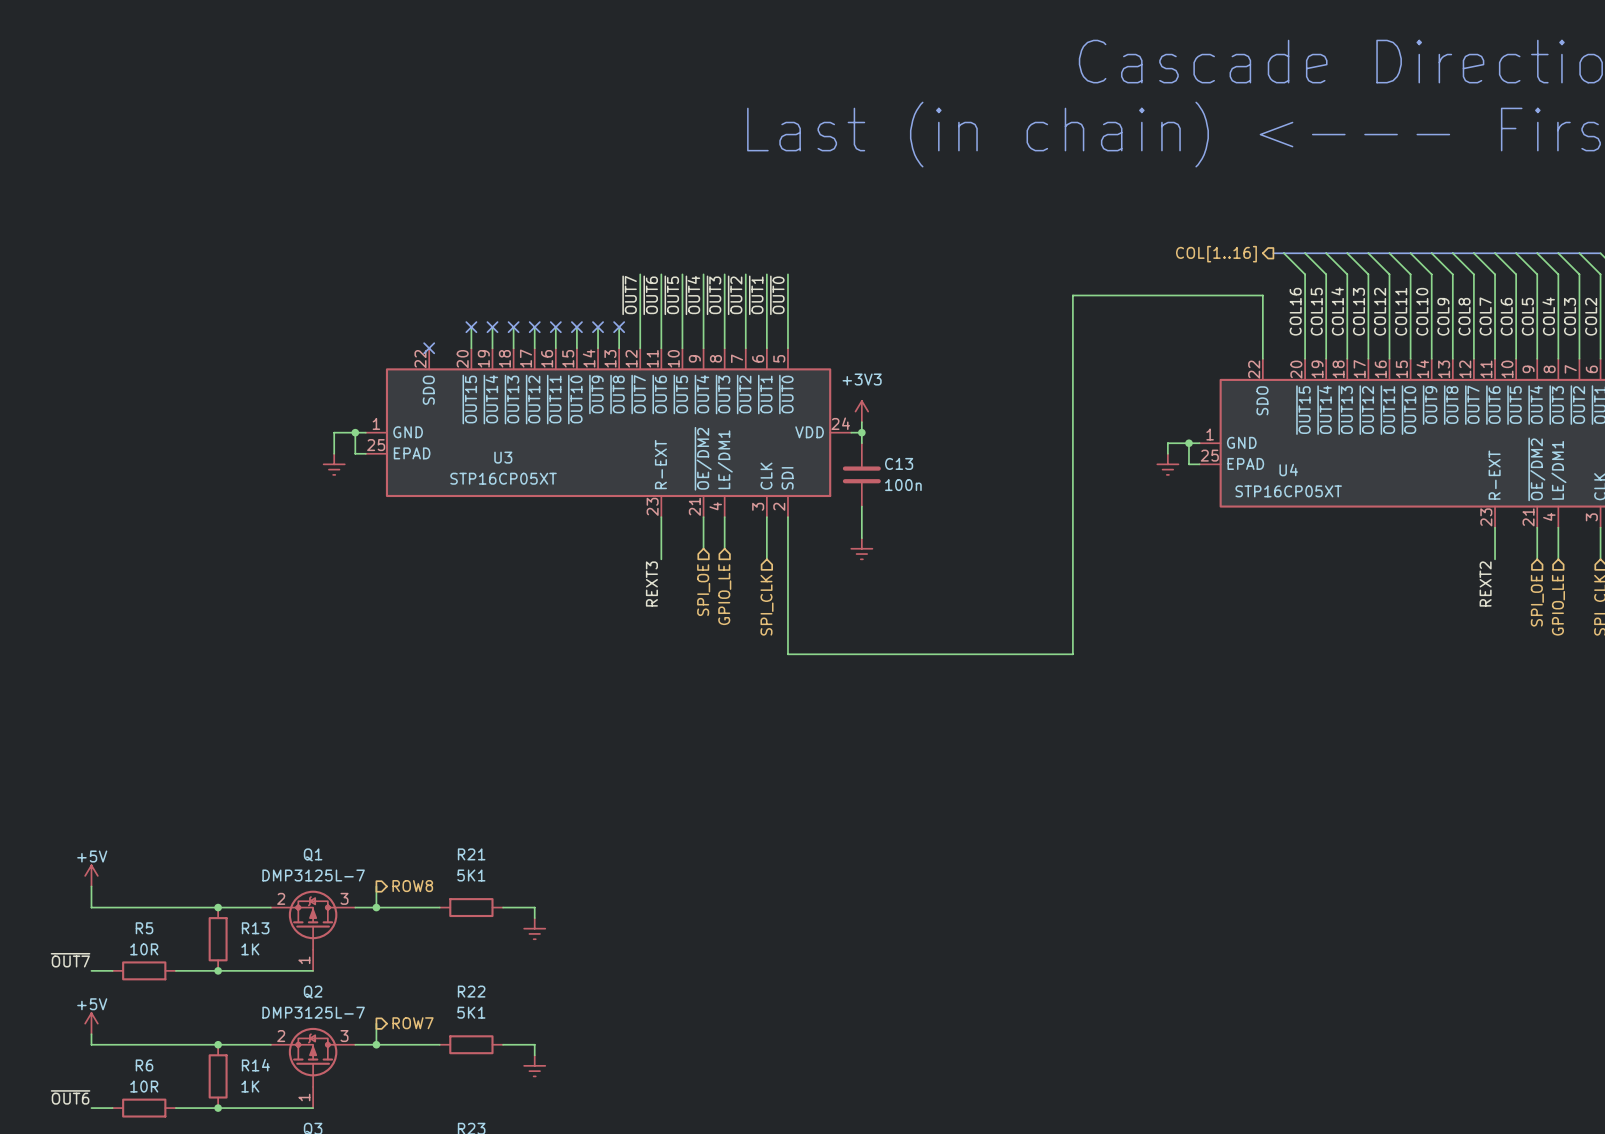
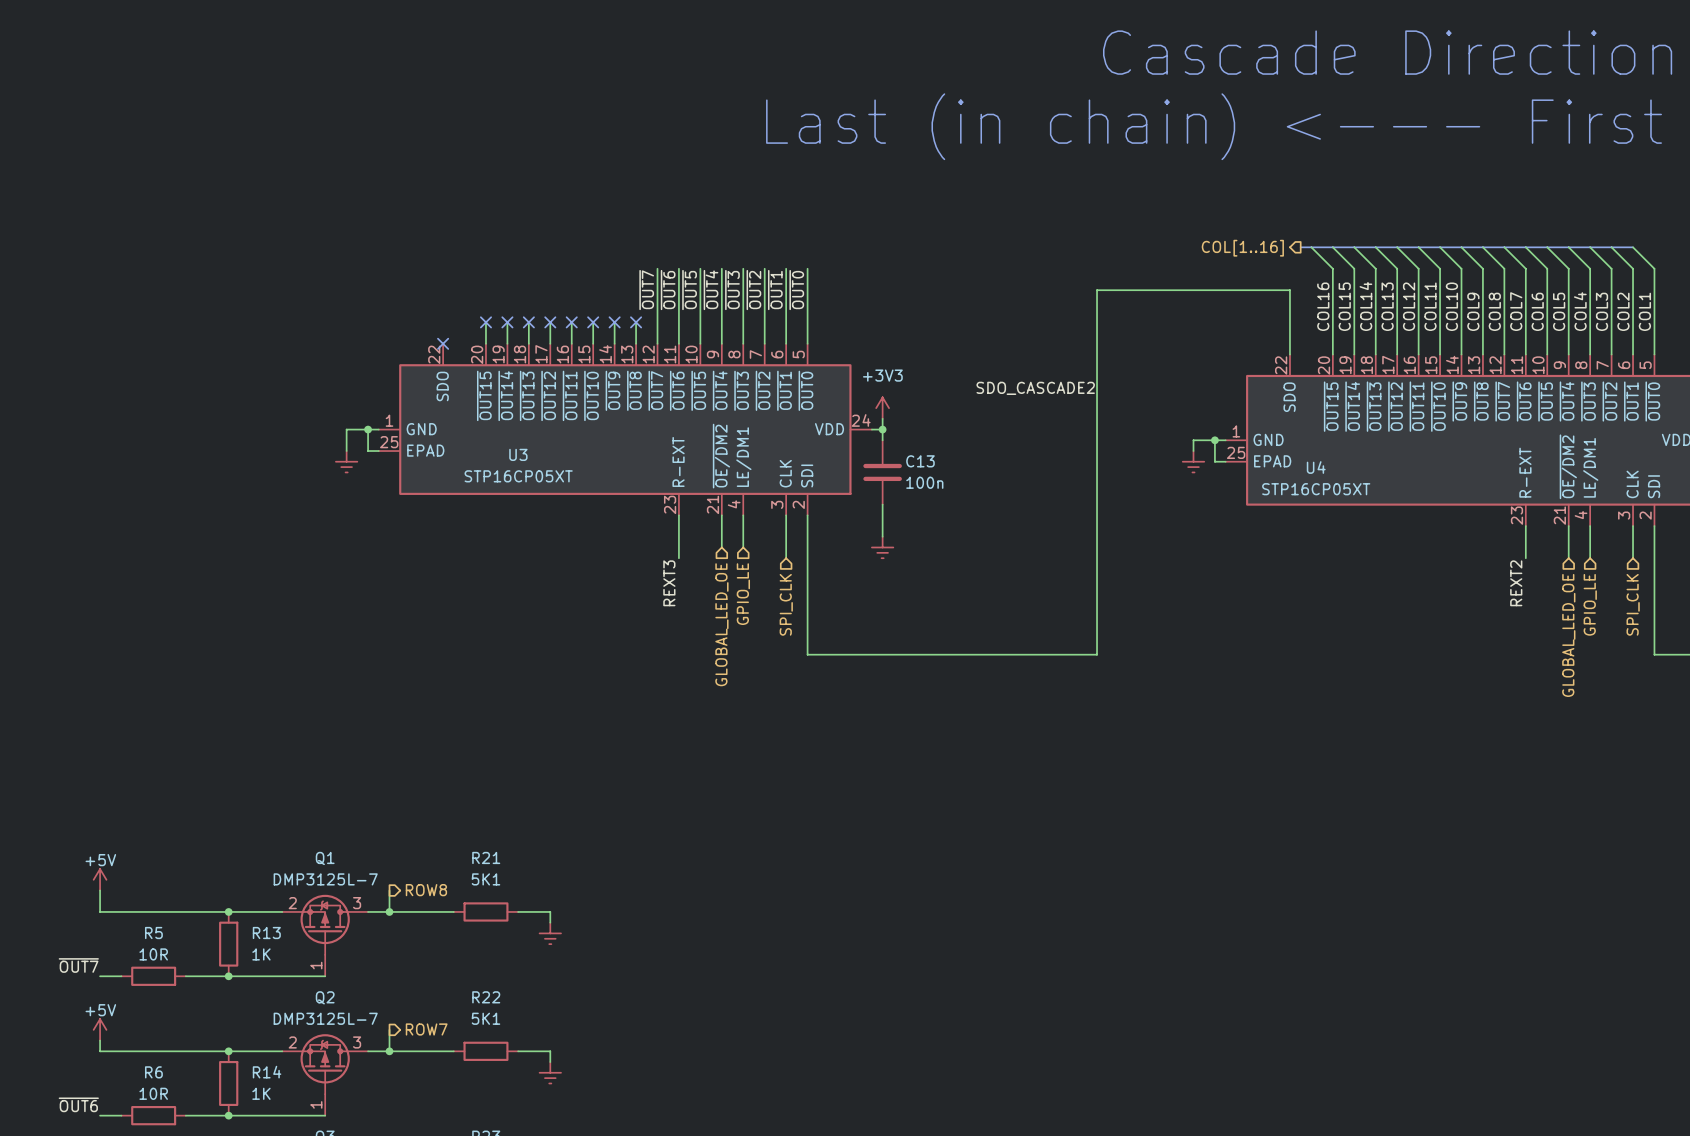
label: none -> SDO_CASCADE2 (1035, 388)
hierarchical label: SPI_OE (703, 590) -> GLOBAL_LED_OE (721, 624)
hierarchical label: SPI_OE (1537, 600) -> GLOBAL_LED_OE (1568, 635)

